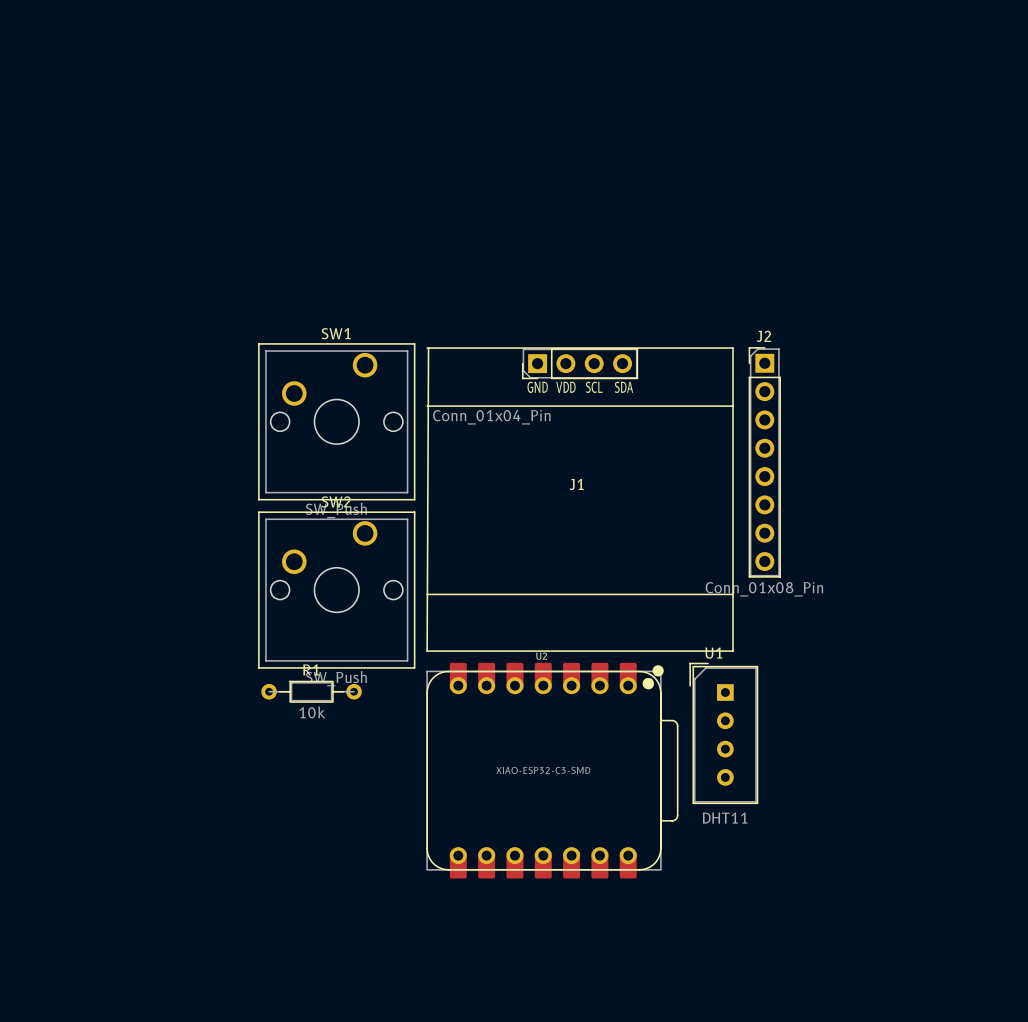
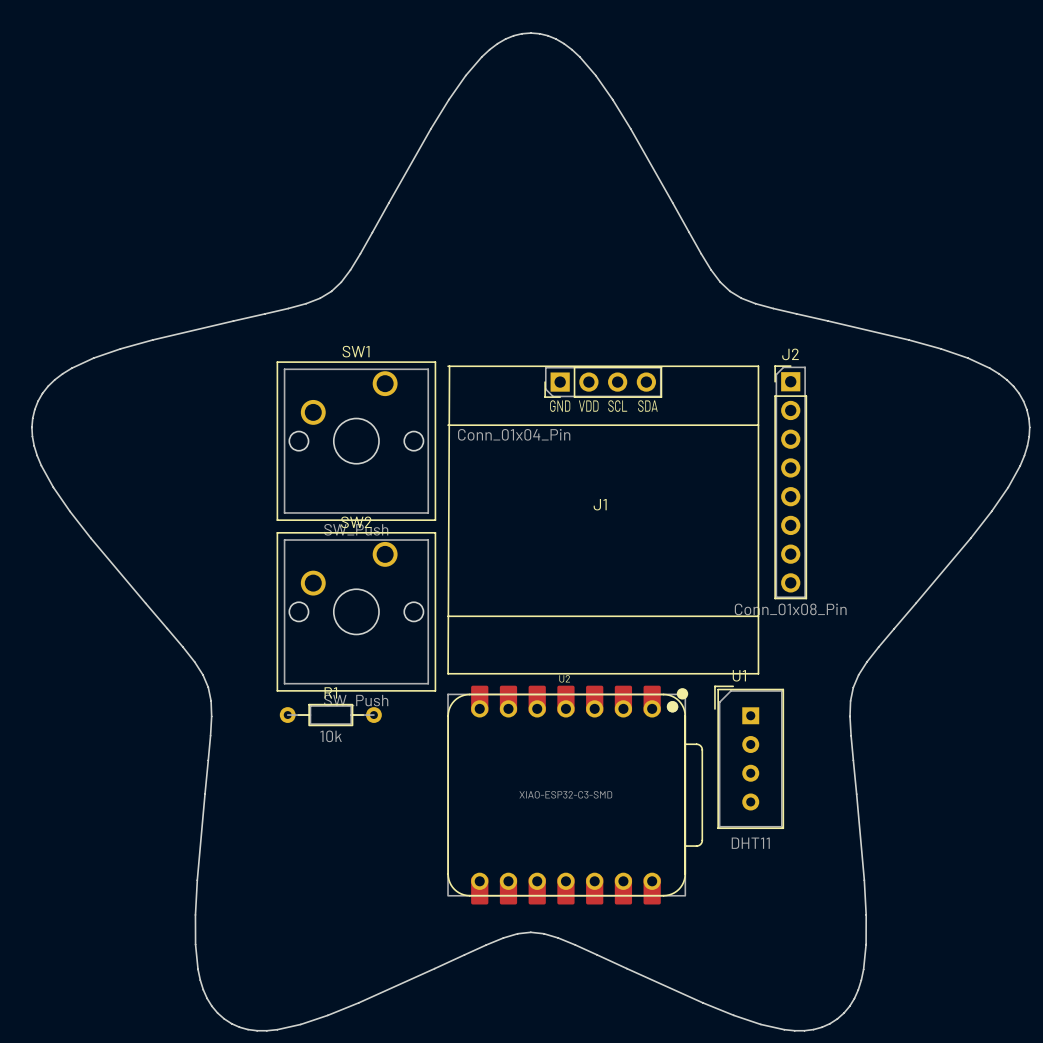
board edge: none -> (530, 33) (513, 35) (497, 43) (481, 56) (465, 75) (431, 128) (350, 270) (331, 291) (306, 303) (152, 340) (93, 358) (71, 368) (54, 379) (42, 393) (34, 409) (31, 427) (34, 445) (41, 465) (53, 487) (91, 538) (194, 662) (208, 687) (211, 716) (197, 880) (195, 944) (200, 980) (207, 998) (217, 1013) (239, 1027) (266, 1030) (300, 1024) (358, 1002) (503, 937) (530, 932) (558, 937) (702, 1002) (760, 1024) (784, 1029) (804, 1030) (822, 1027) (837, 1018) (849, 1006) (858, 989) (863, 969) (866, 944) (864, 880) (849, 716) (853, 687) (866, 662) (991, 511) (1020, 465) (1027, 445) (1029, 427) (1023, 401) (1013, 386) (989, 368) (941, 348) (755, 303) (730, 291) (711, 270) (630, 128) (595, 75) (579, 56) (564, 43) (547, 35) (530, 33)

